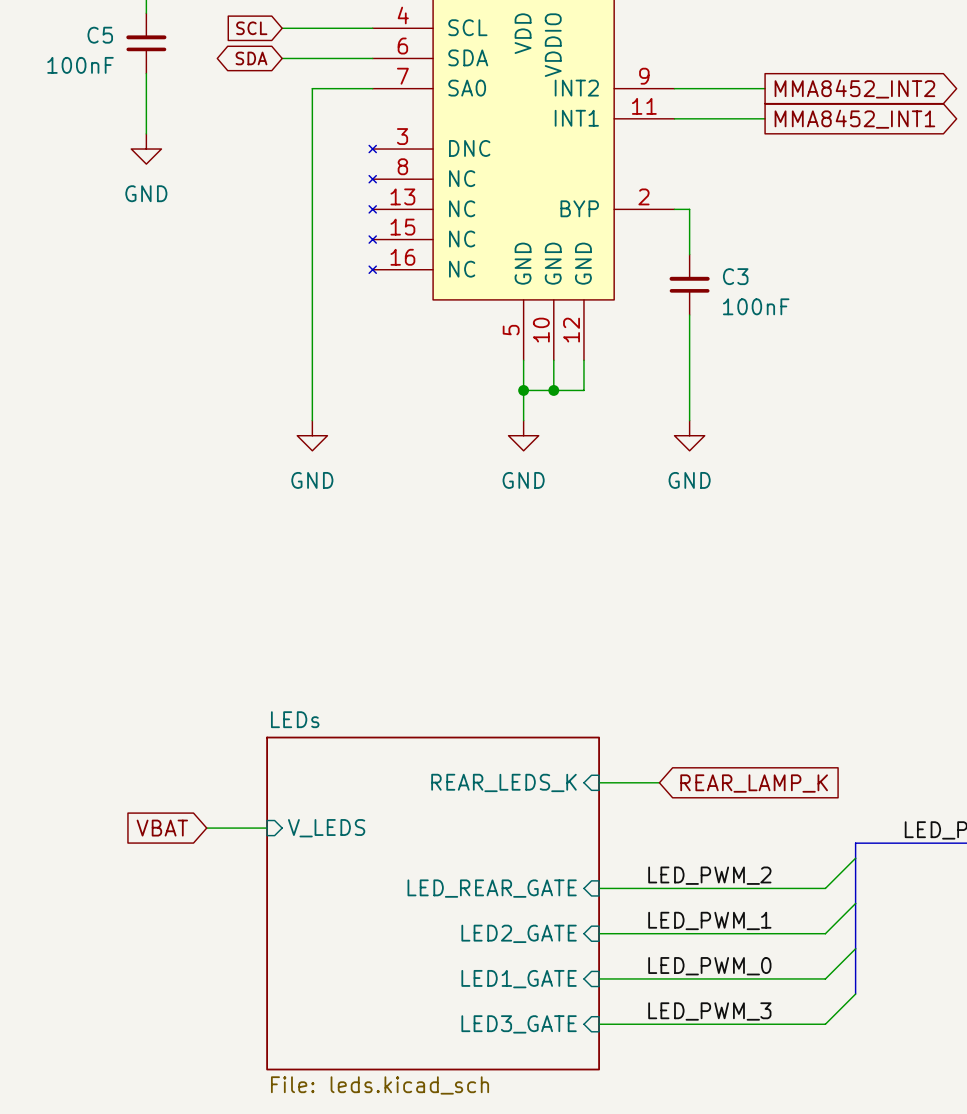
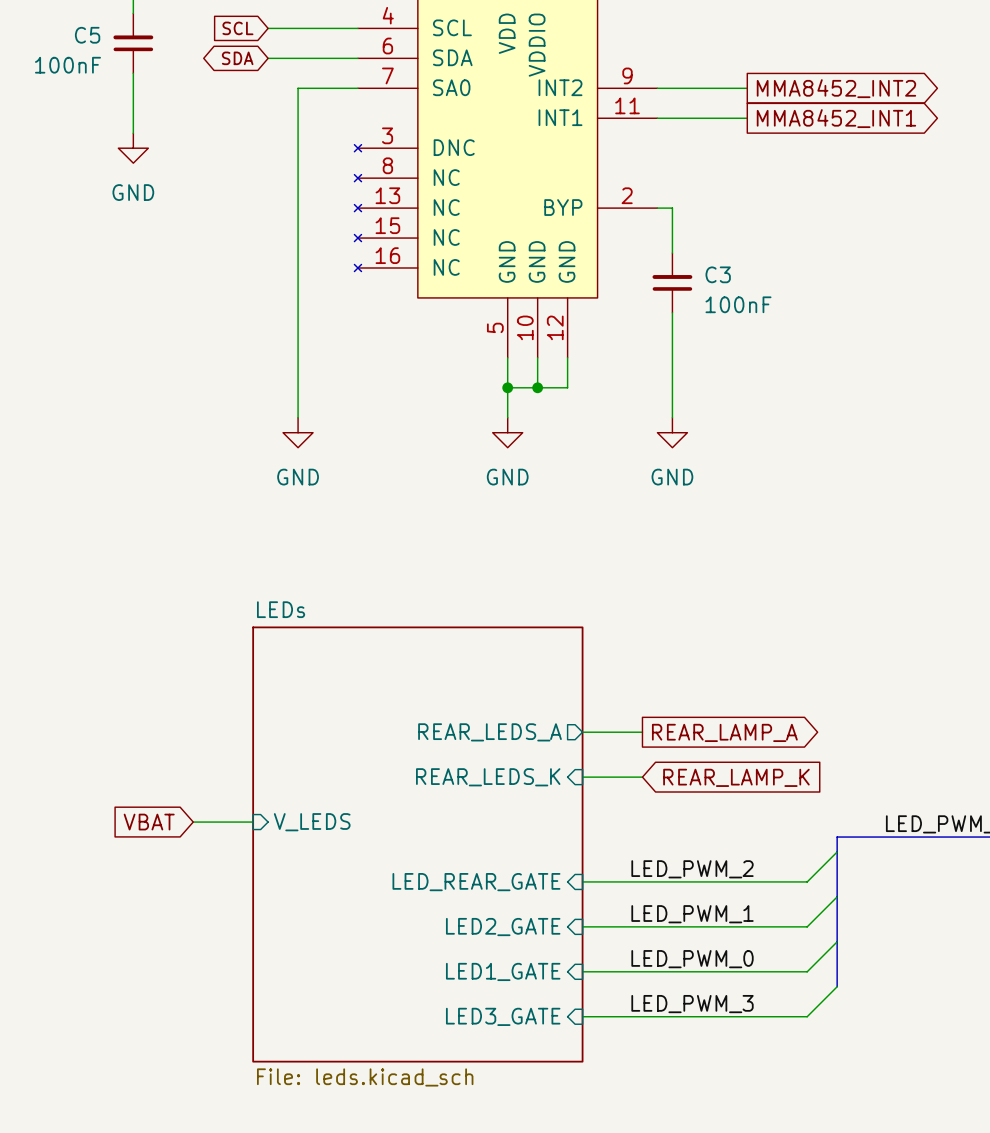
sheet pin: none -> REAR_LEDS_A (490, 732)
wire: none -> (582, 732) (642, 732)
global label: none -> REAR_LAMP_A (724, 732)
sheet LEDs: none -> File: leds.kicad_sch (417, 844)
sheet LEDs: File: leds.kicad_sch (433, 903) -> none

